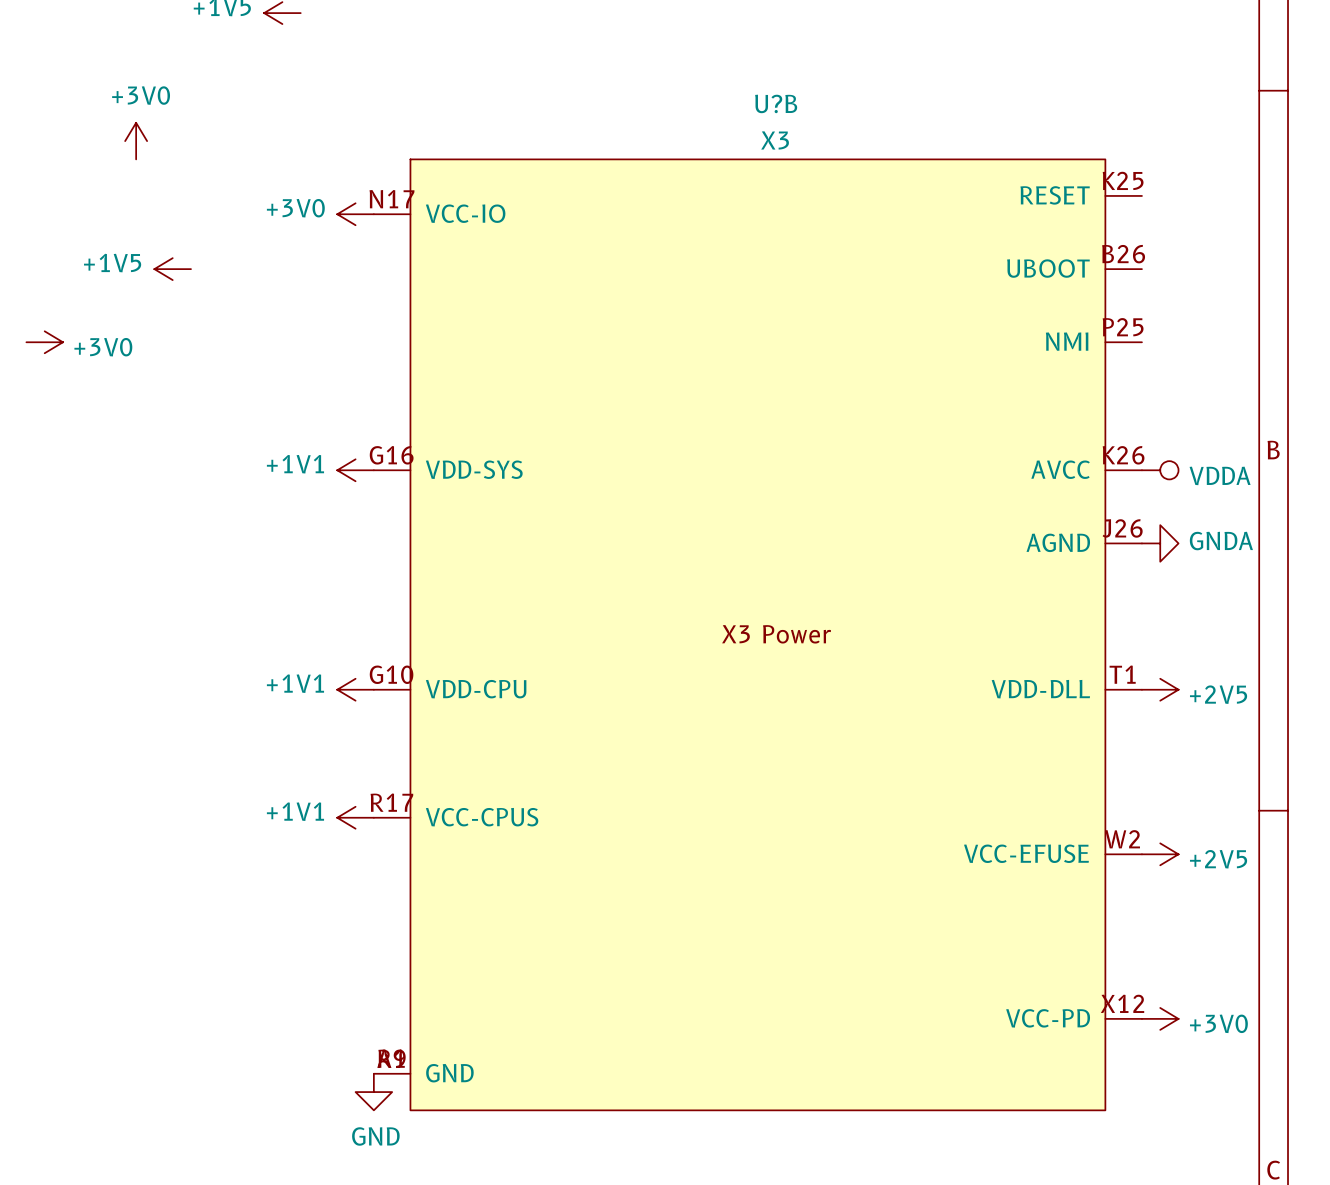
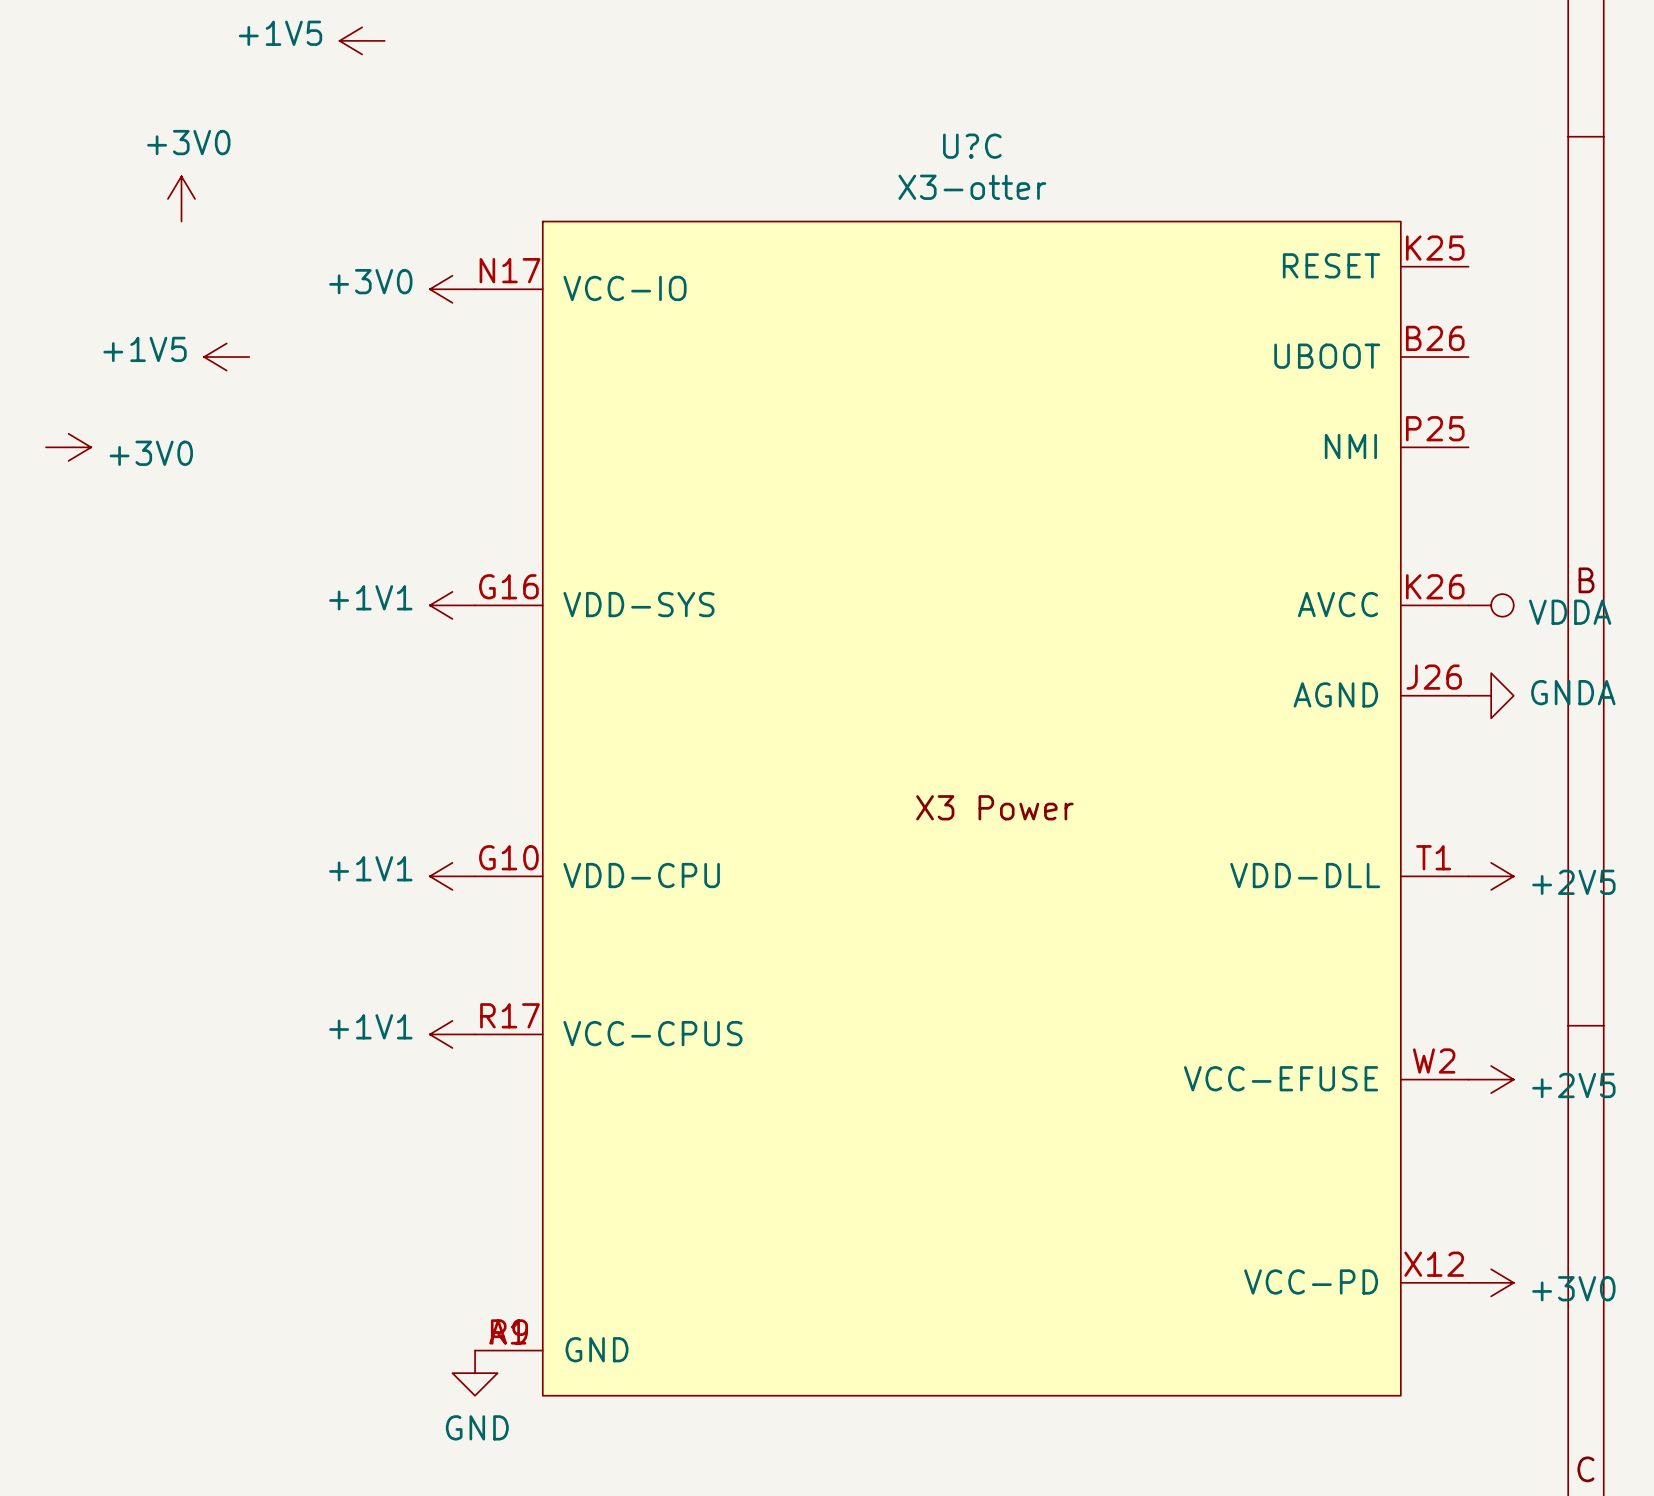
power symbol position: VDDA (1160, 470) -> VDDA (1491, 605)
power symbol position: GNDA (1160, 543) -> GNDA (1491, 695)
U?B: X3 (757, 634) -> none
U?C: none -> X3-otter (971, 808)
power symbol position: +2V5 (1160, 689) -> +2V5 (1491, 876)
power symbol position: +2V5 (1160, 854) -> +2V5 (1491, 1079)
power symbol position: +3V0 (1160, 1018) -> +3V0 (1491, 1282)

